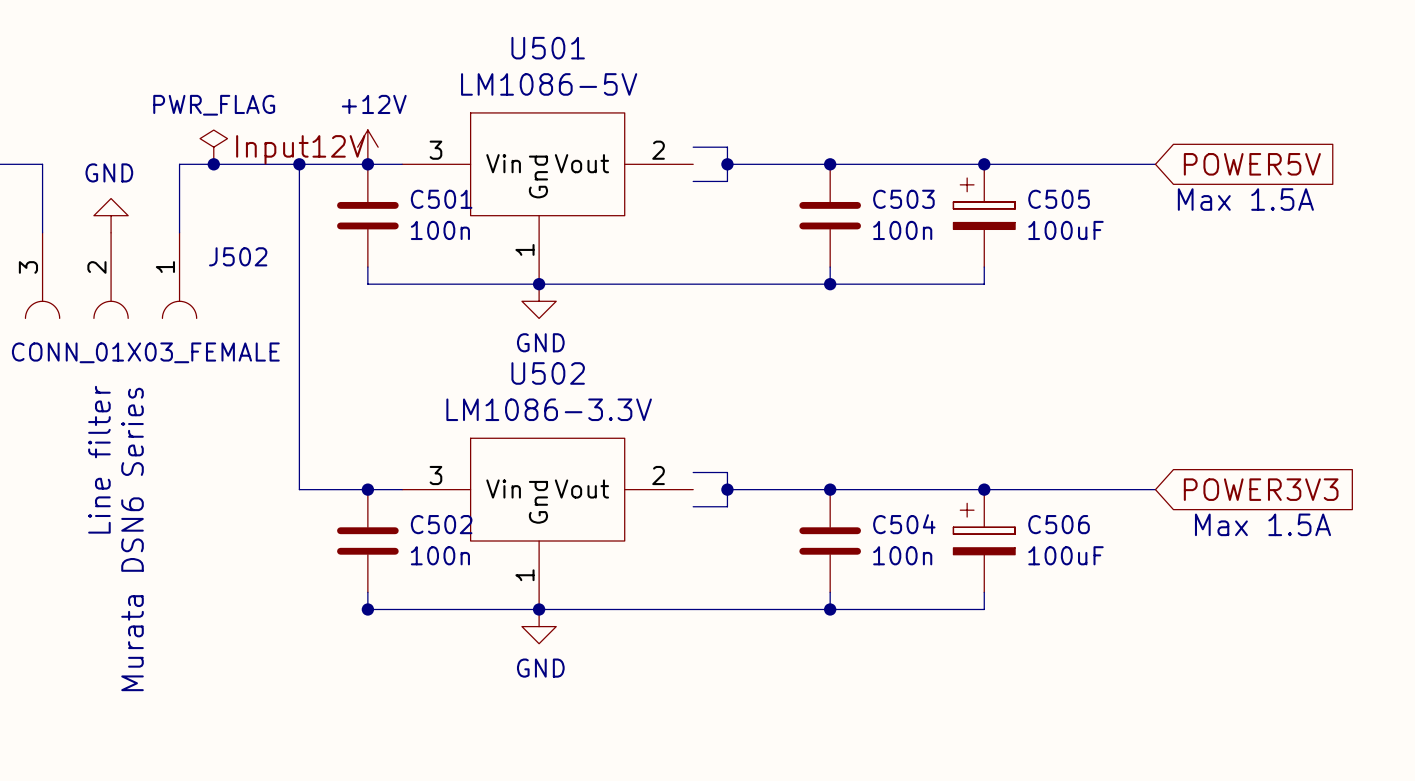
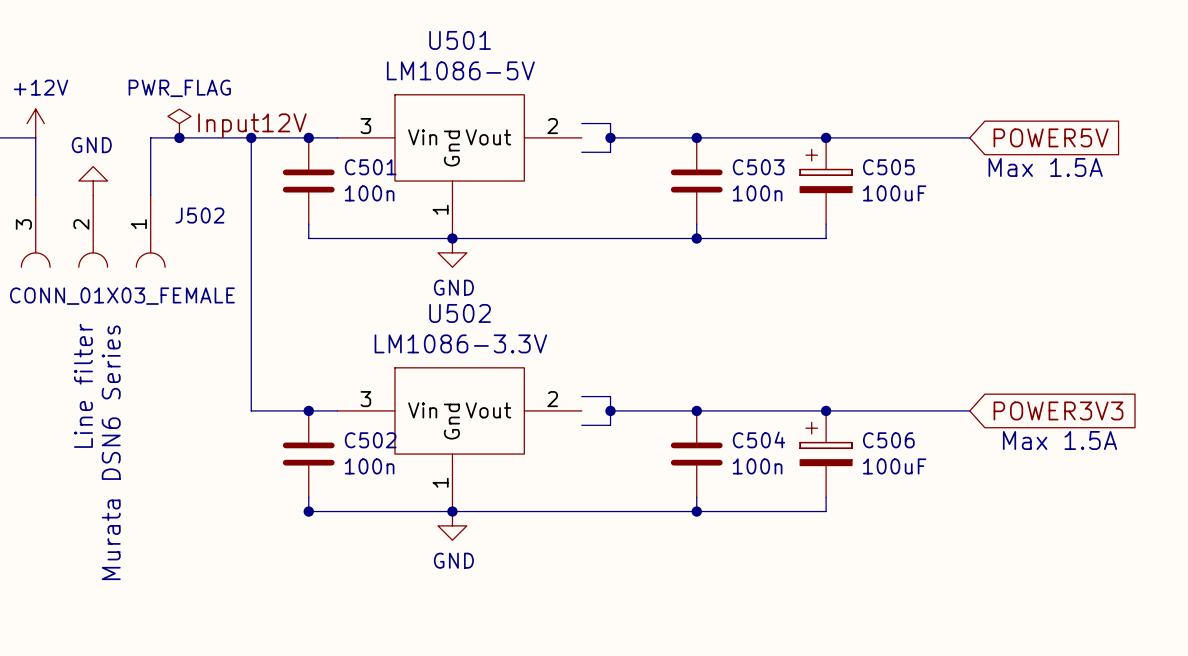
power symbol position: +12V (367, 147) -> +12V (35, 123)

